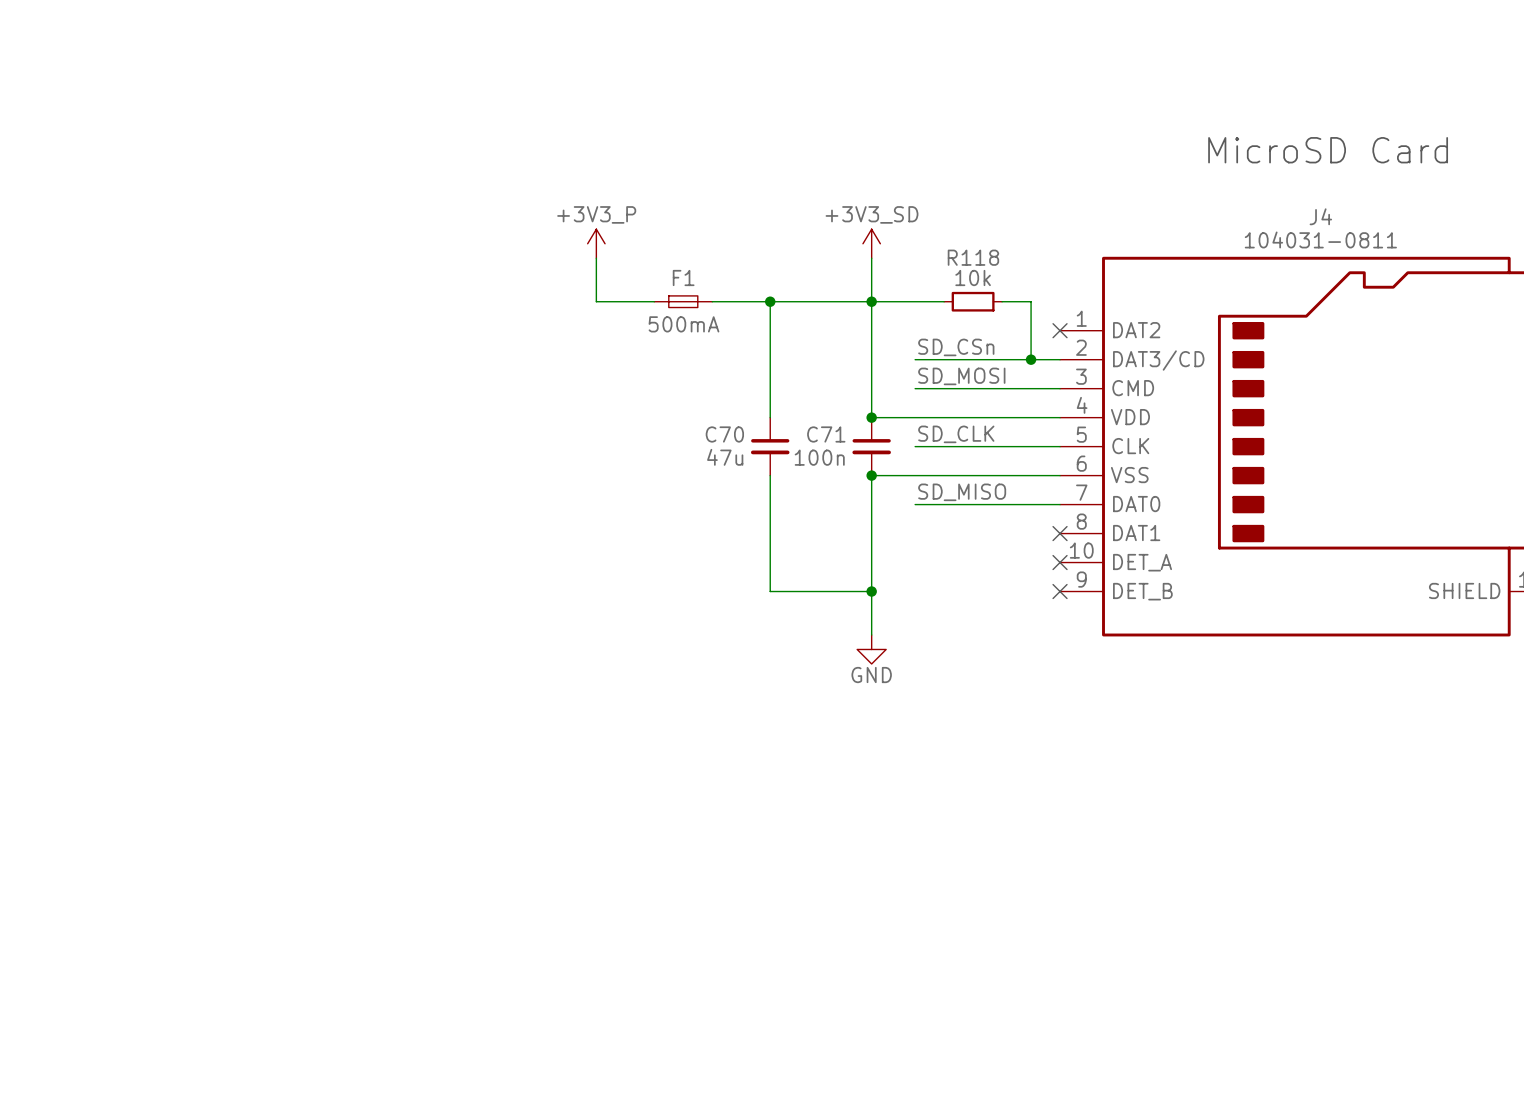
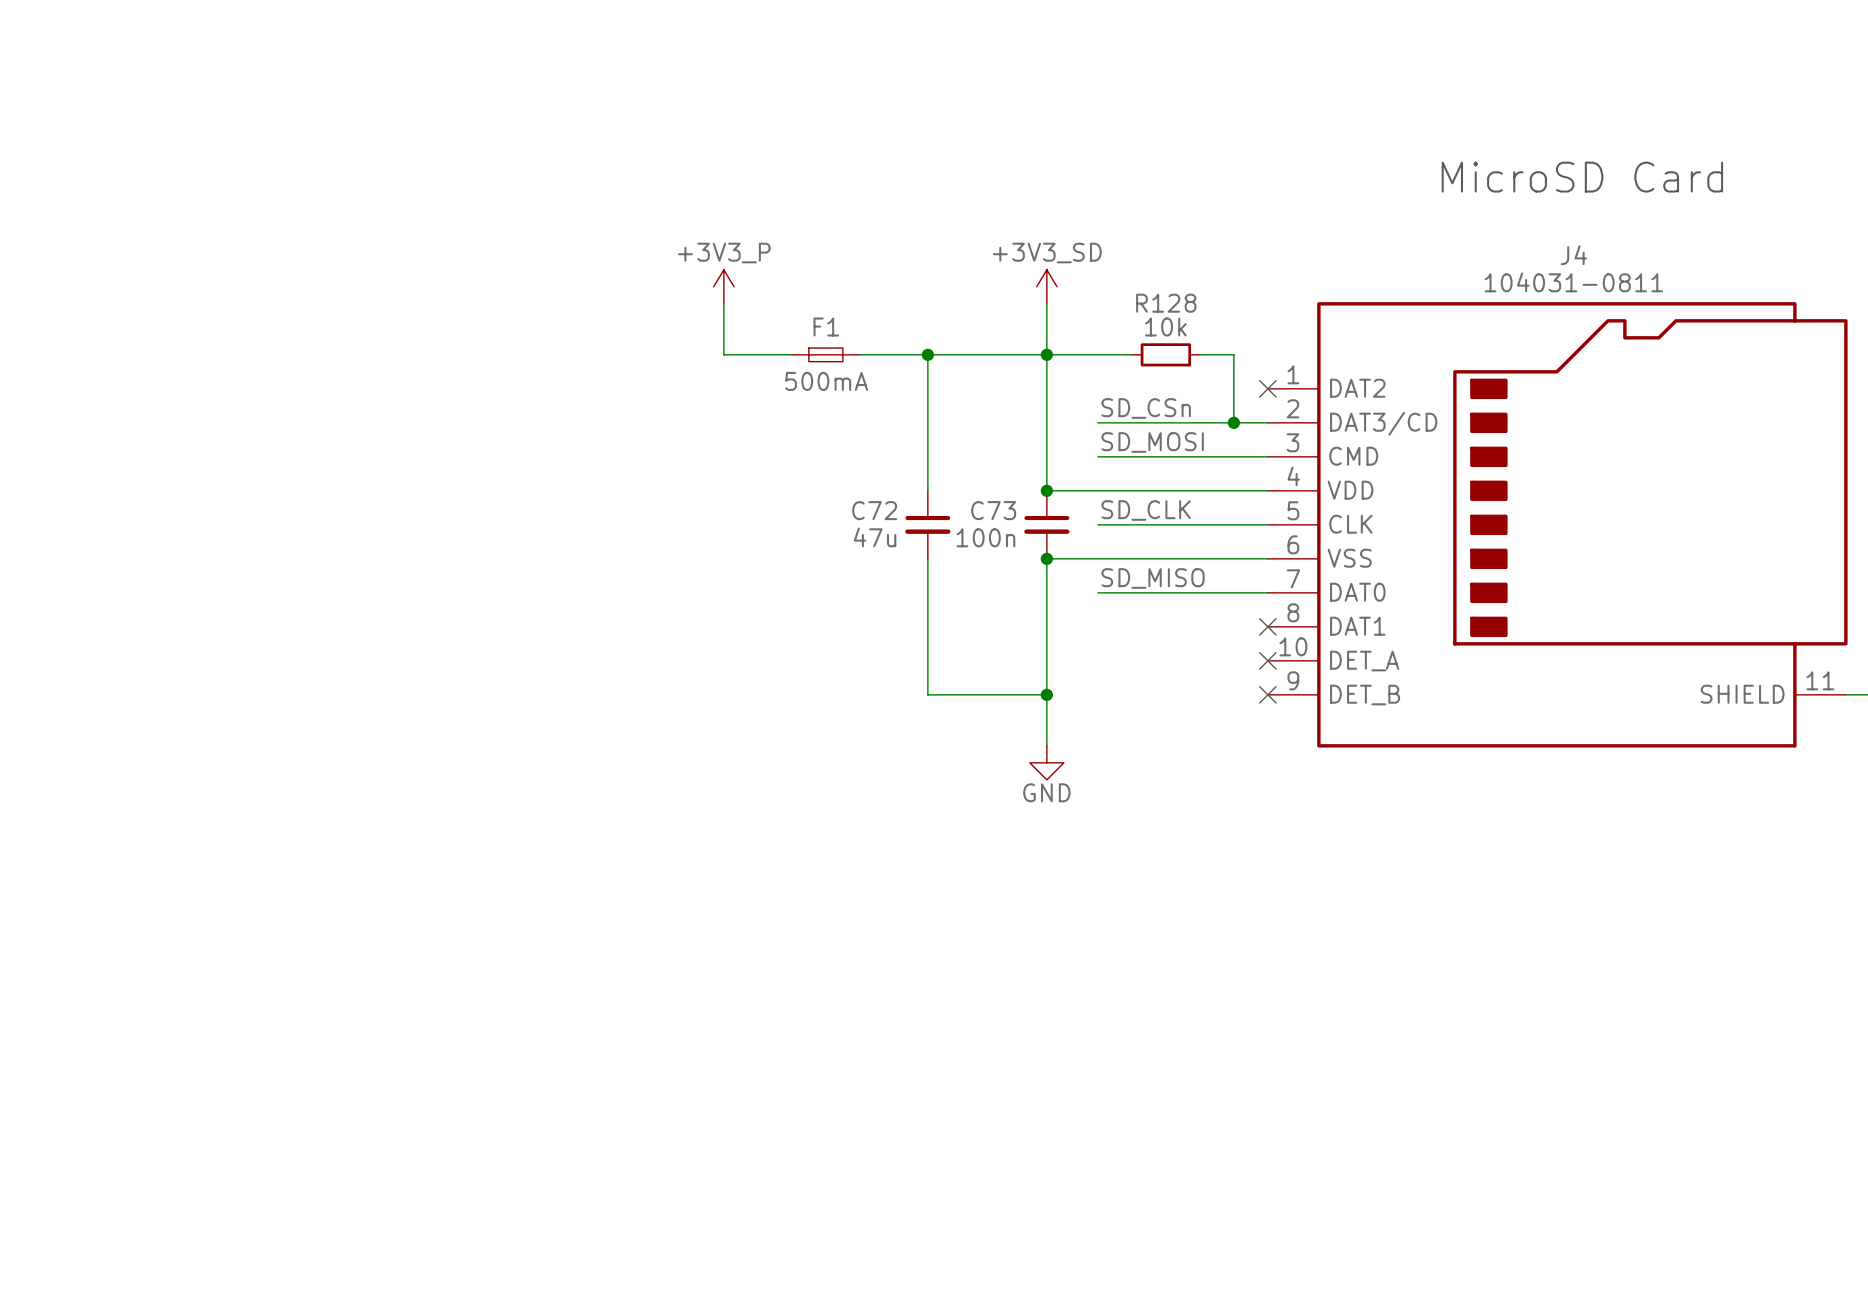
R118 name: R118 (973, 257) -> R128 (1166, 303)
C70 name: C70 (724, 434) -> C72 (874, 510)
C71 name: C71 (826, 434) -> C73 (993, 510)

